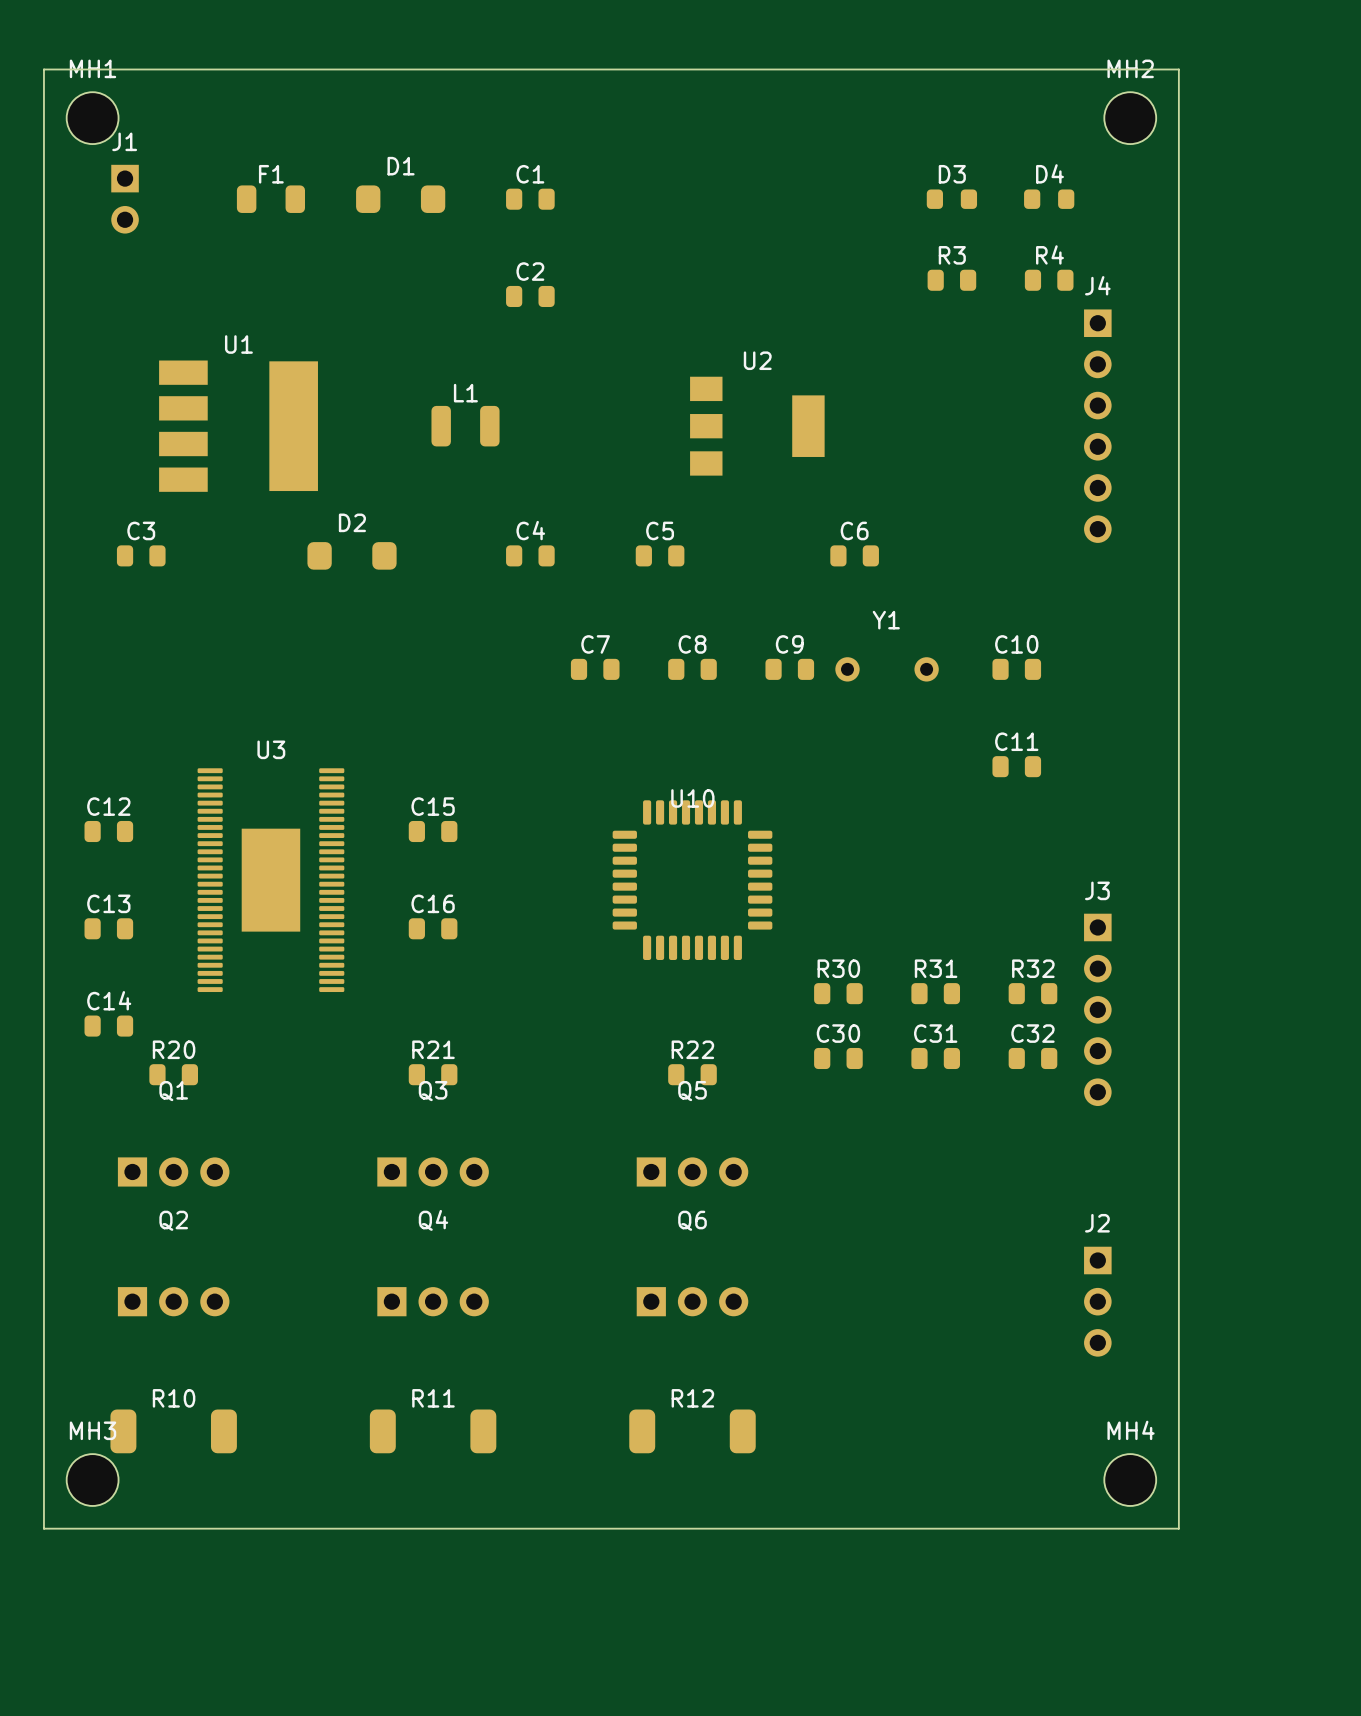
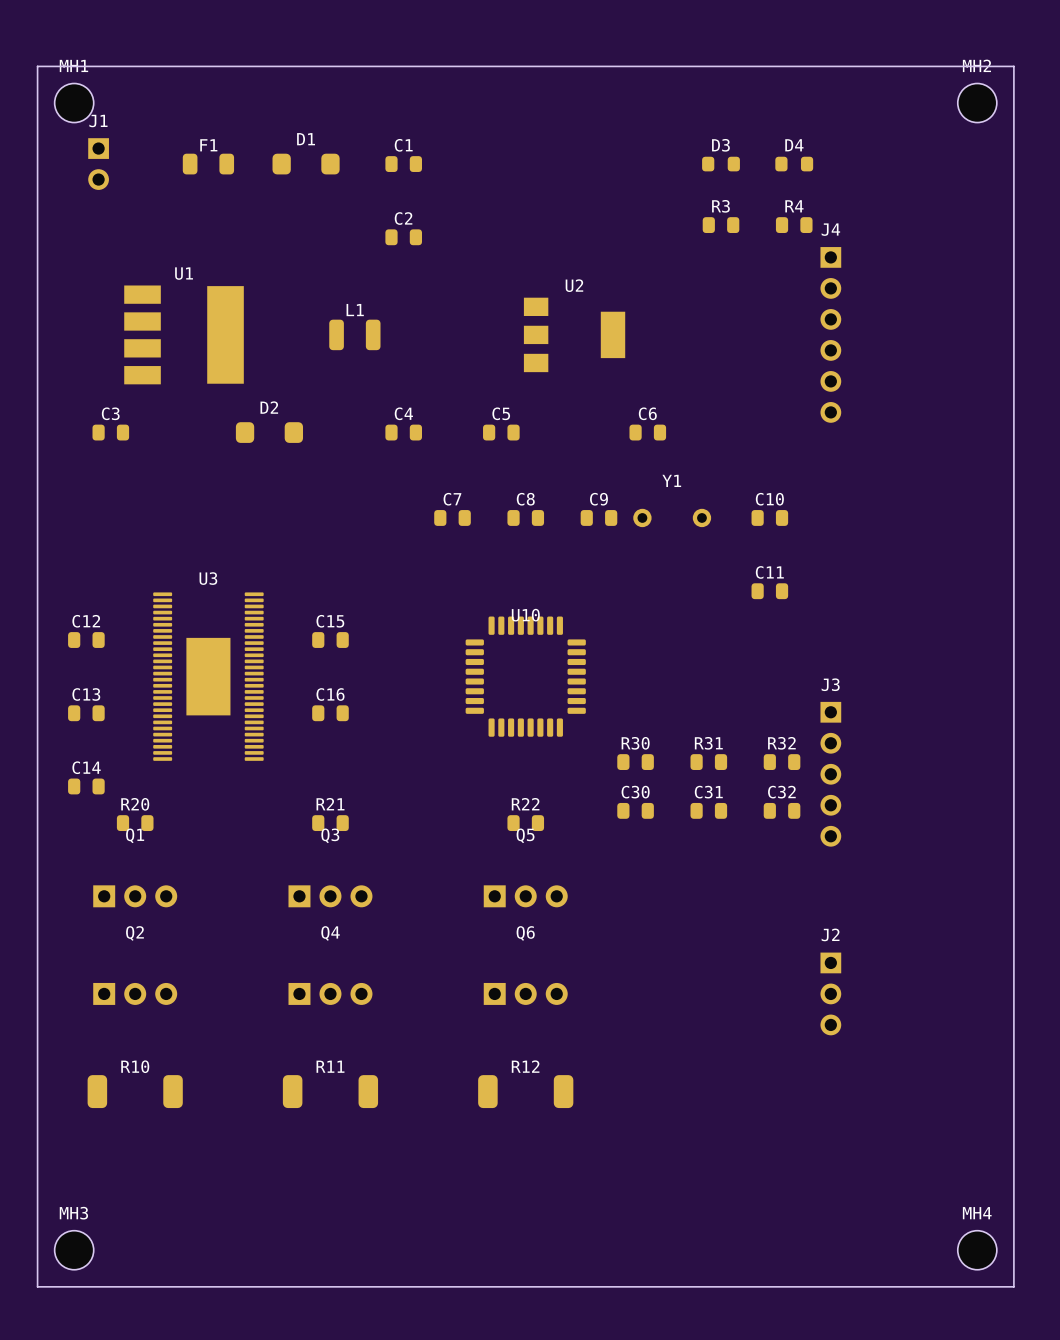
board edge: (1178, 69) (1178, 1528) (43, 1528) -> (891, 66) (1013, 66) (1013, 1286) (37, 1286) (37, 1164)
MH2 position: (1130, 118) -> (977, 103)
MH3 position: (92, 1480) -> (74, 1250)
MH4 position: (1130, 1480) -> (977, 1250)

